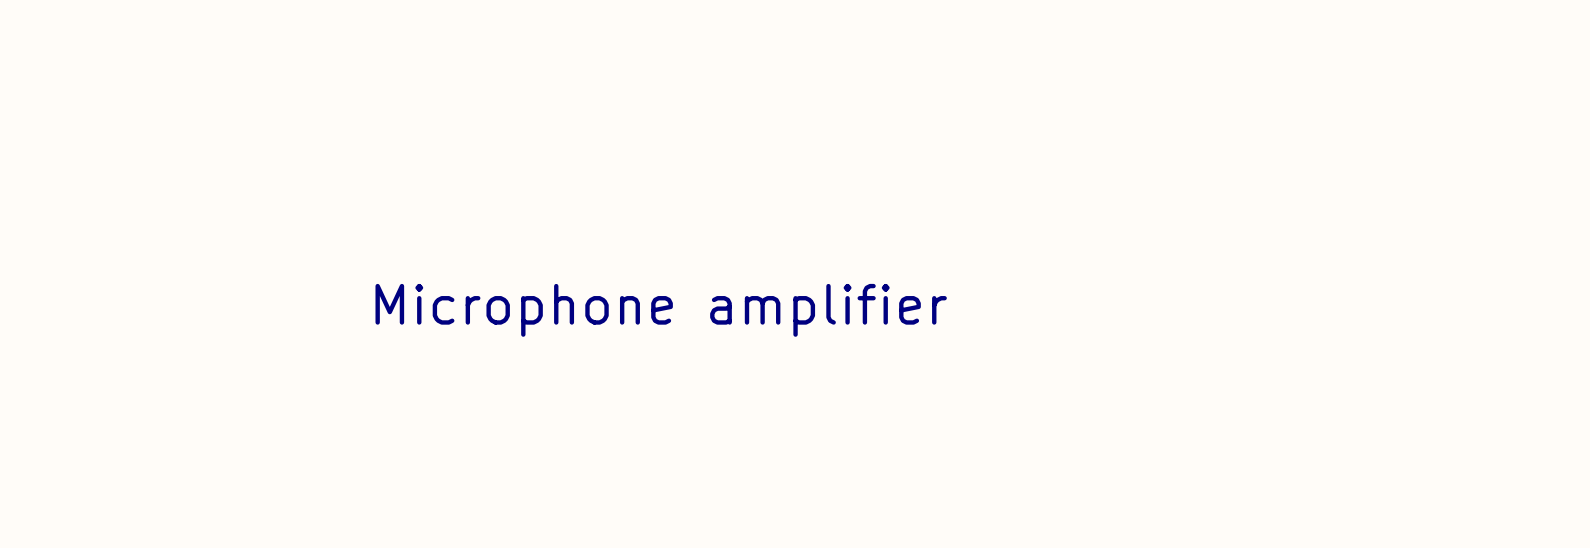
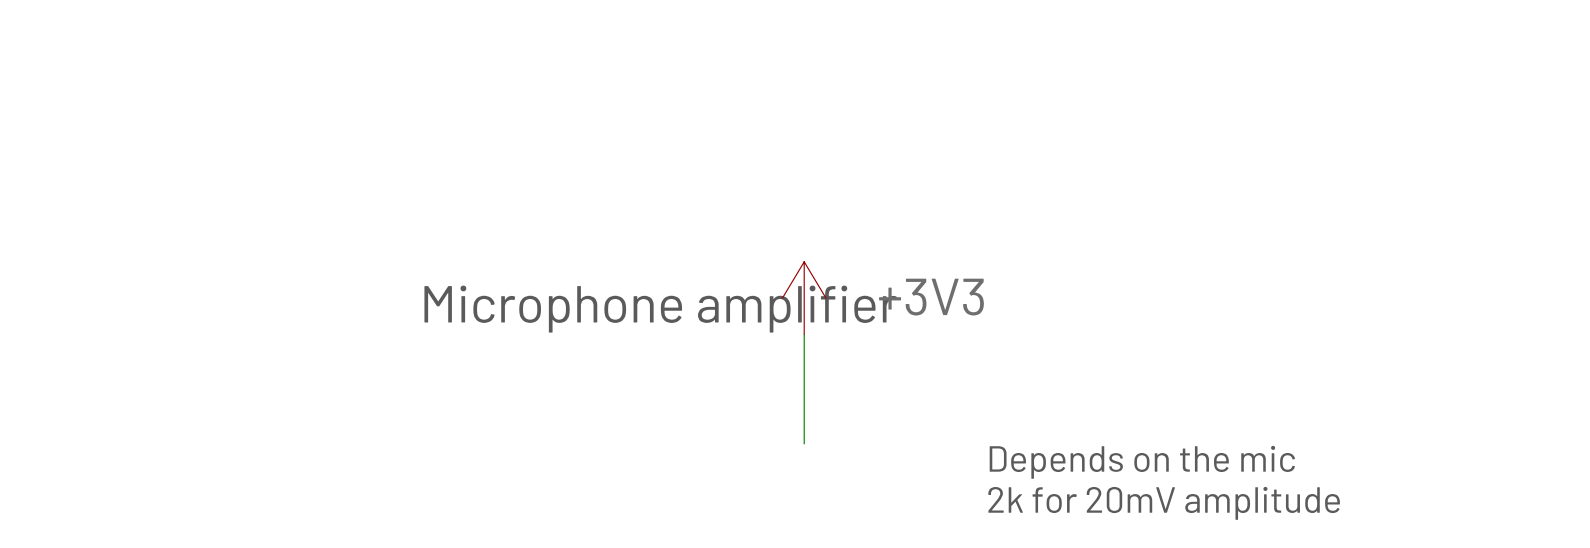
power symbol: none -> +3V3 (804, 298)
wire: none -> (804, 334) (804, 443)
text: none -> Depends on the mic (1142, 462)
text: none -> 2k for 20mV amplitude (1164, 503)

